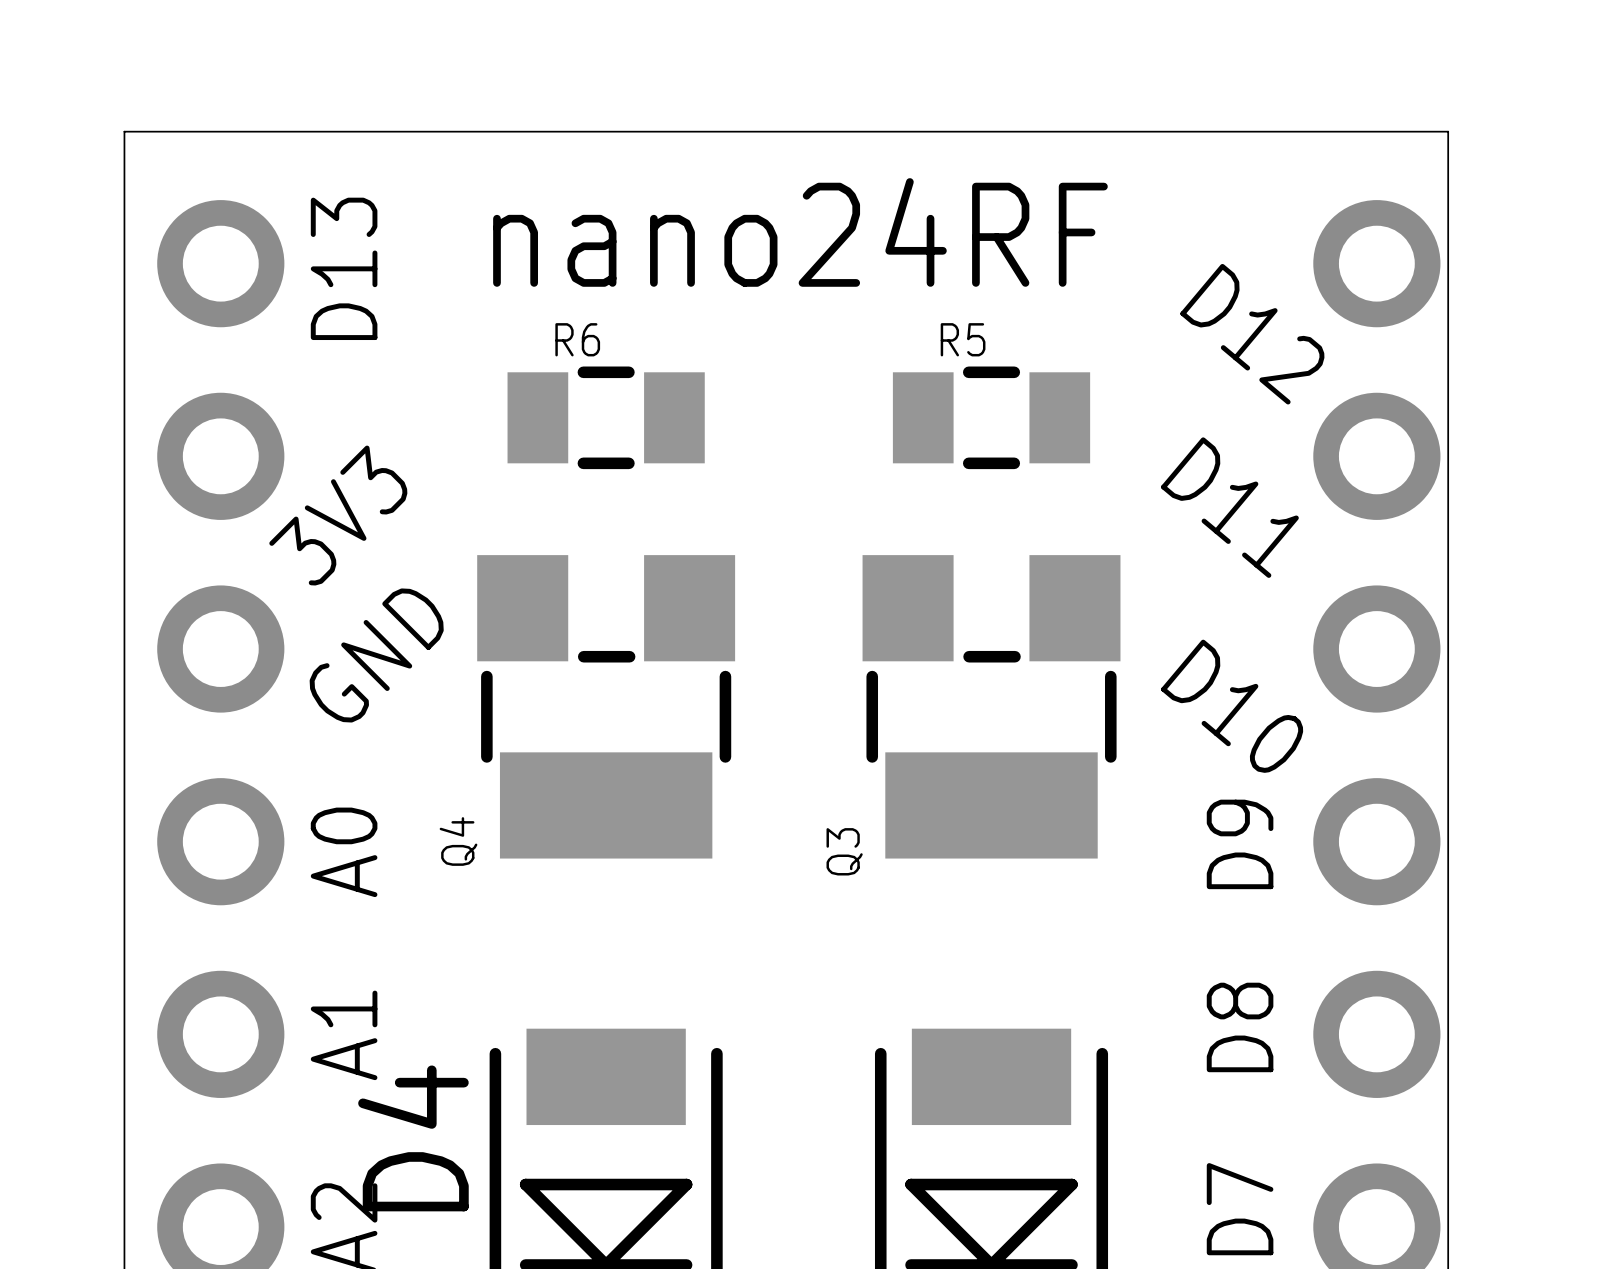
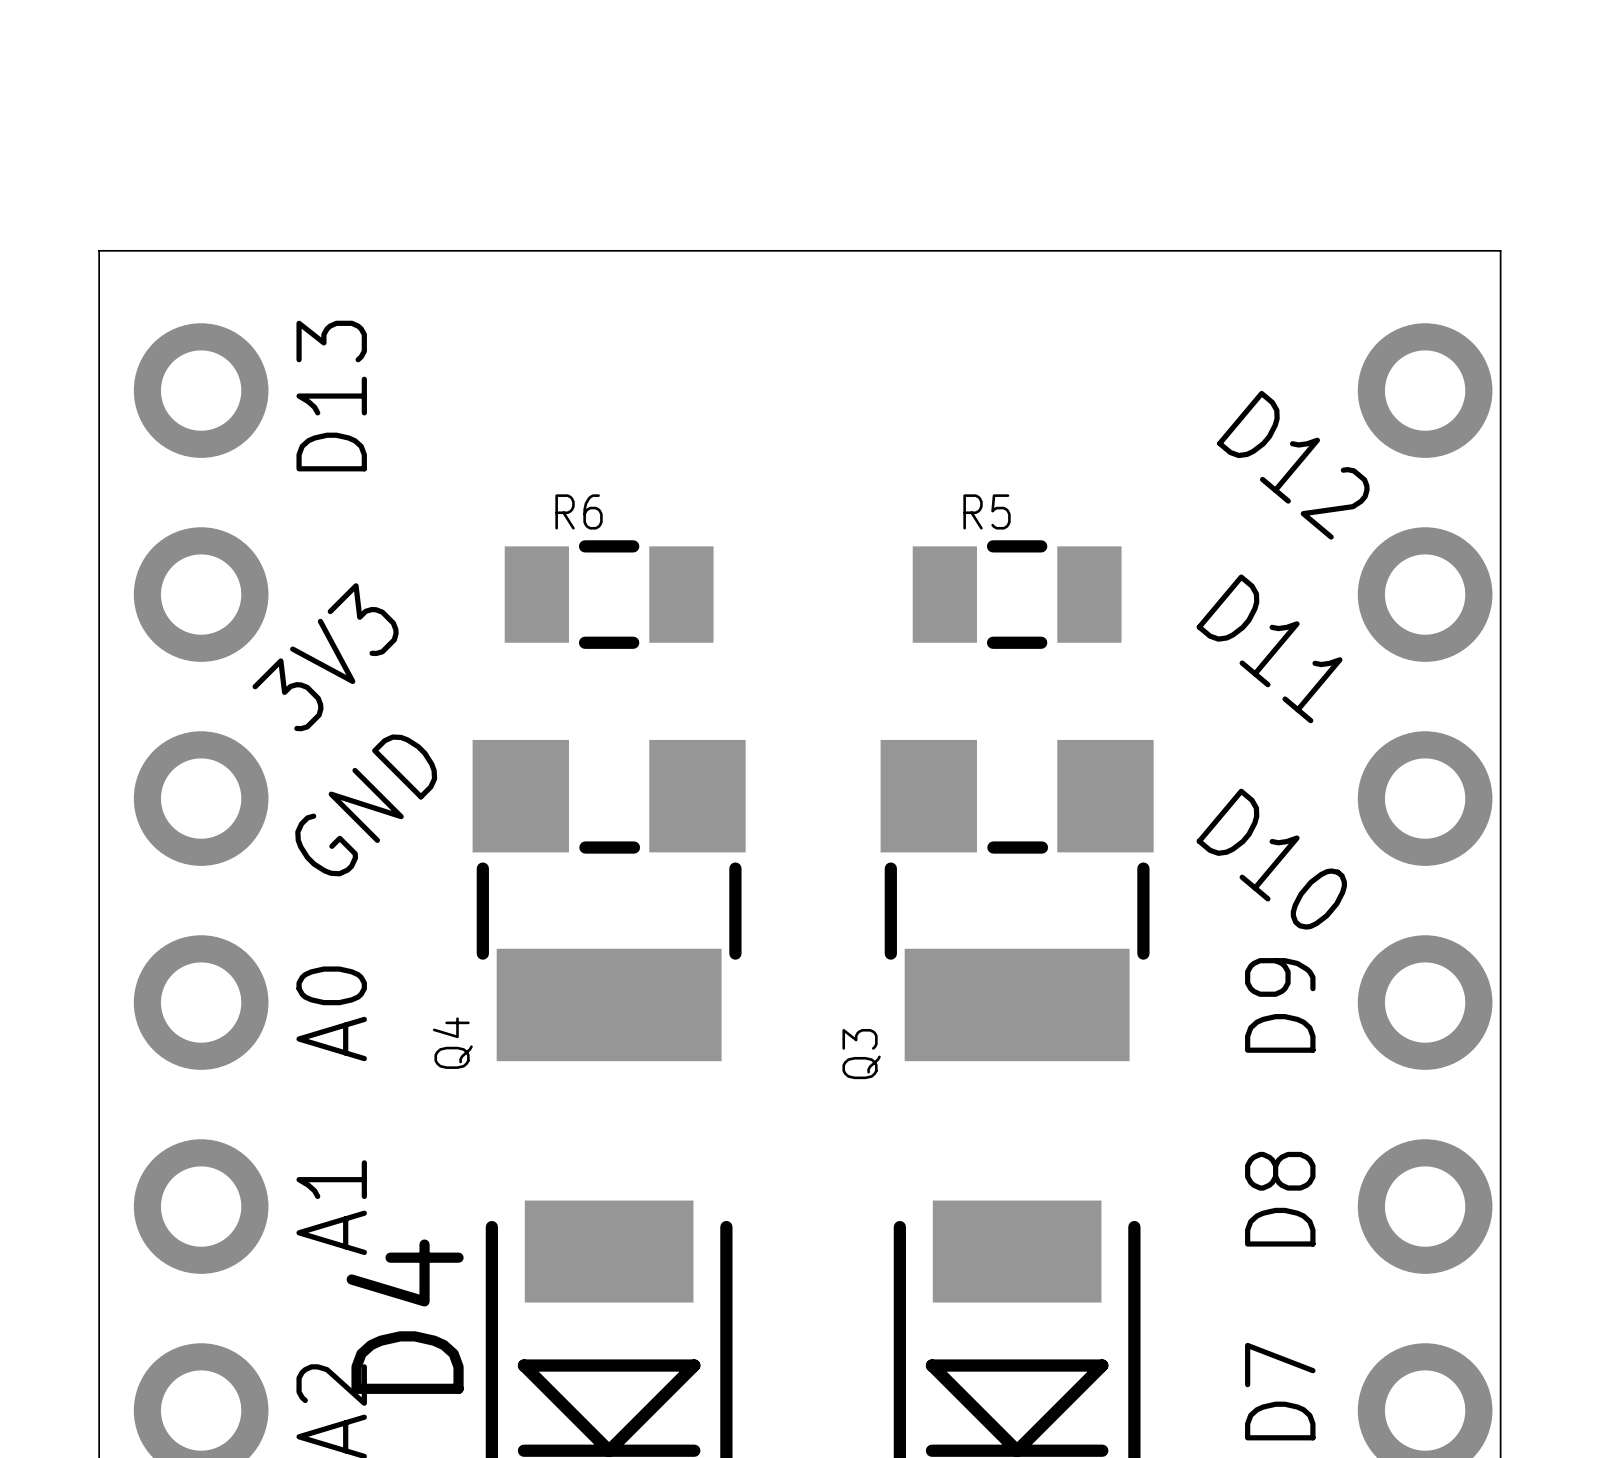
text: nano24RF (800, 232) -> none
R6 position: (606, 417) -> (609, 594)
R5 position: (991, 417) -> (1017, 594)
Q4 position: (606, 706) -> (609, 900)
Q3 position: (991, 706) -> (1017, 900)

